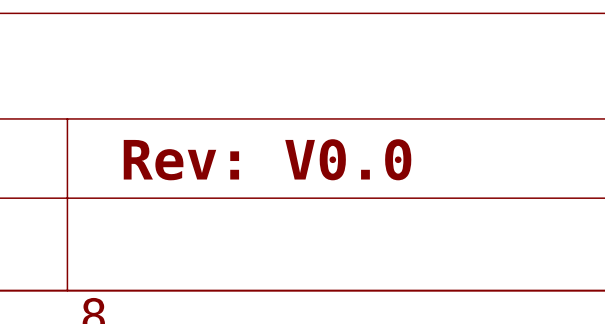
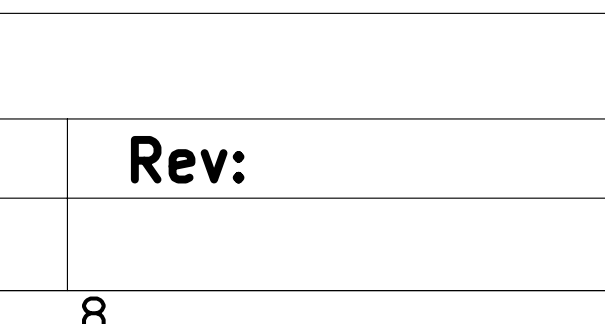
title block: Rev: V0.0 (267, 159) -> Rev: (187, 159)

